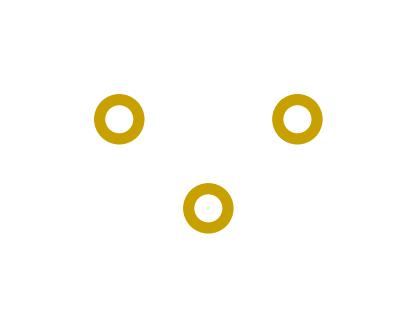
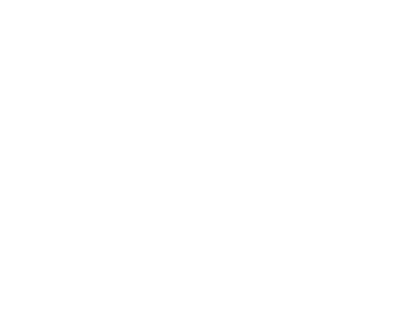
part: (208, 163) -> none

